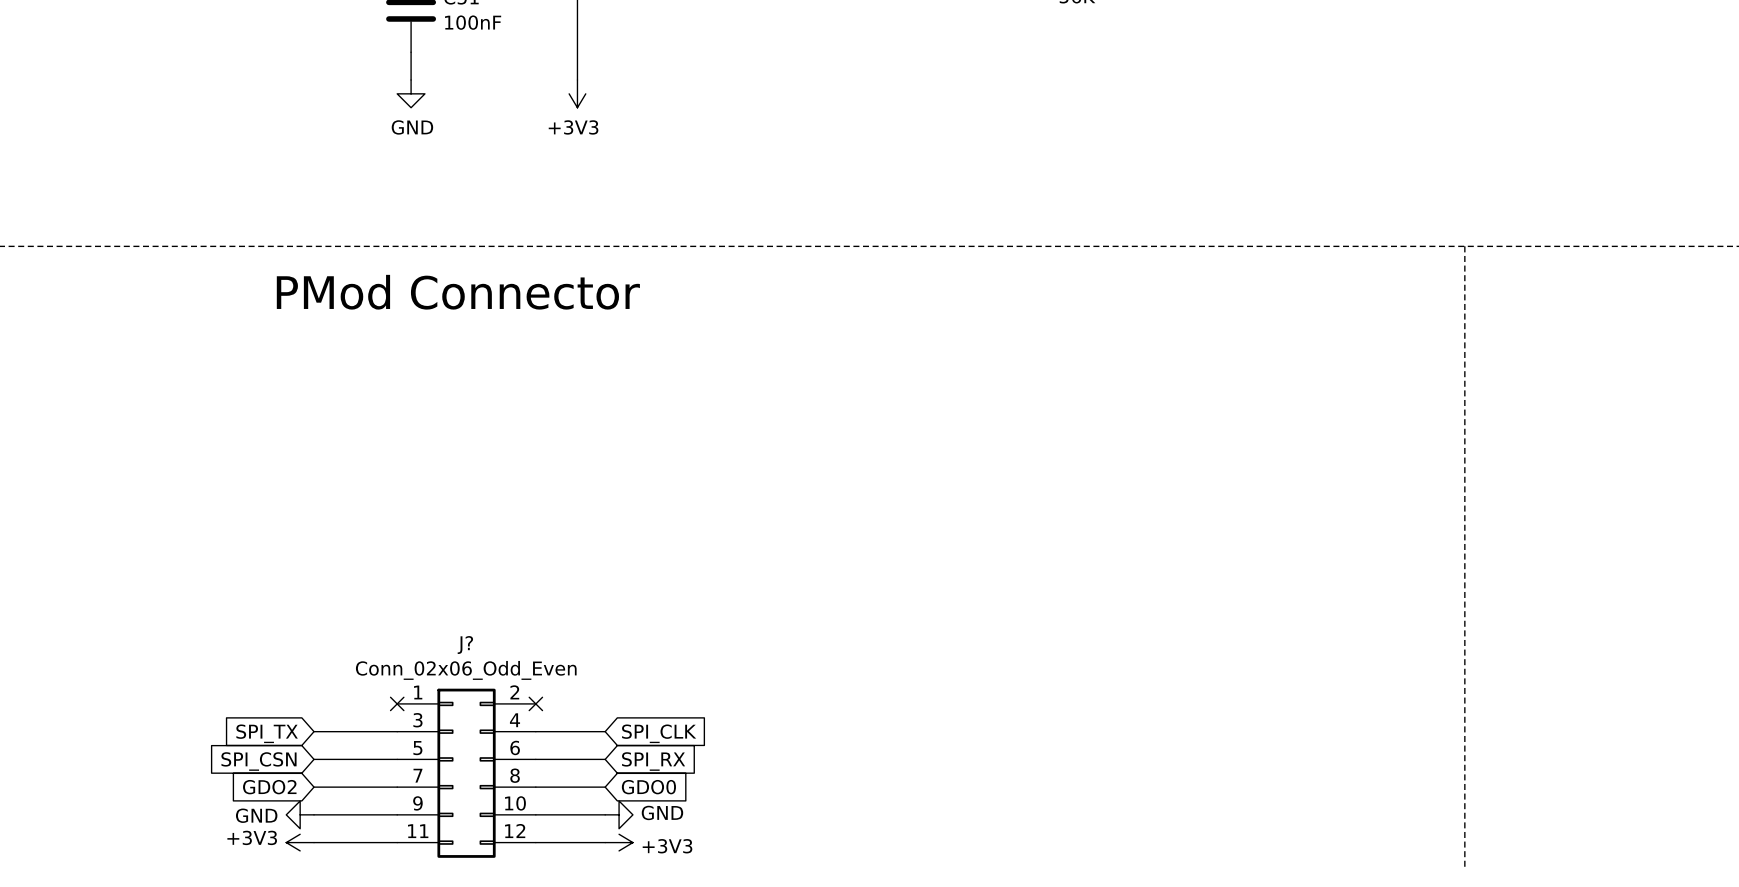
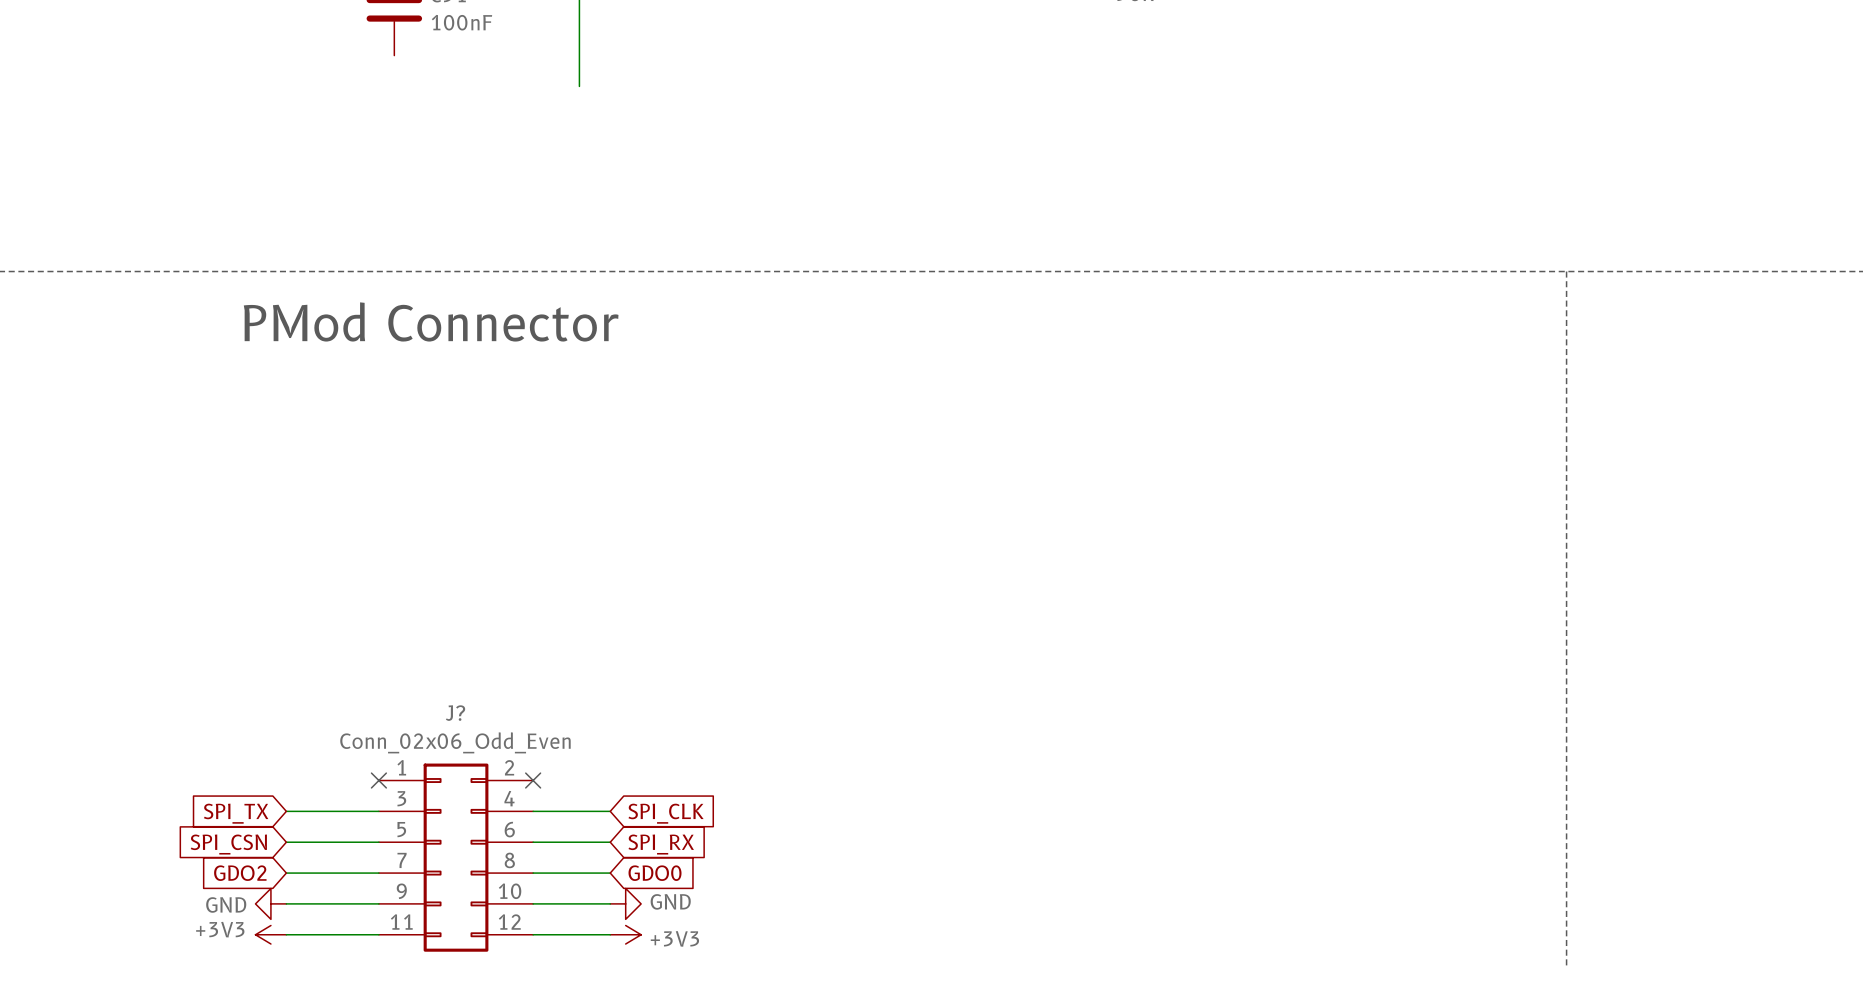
wire: (411, 52) (411, 79) -> none
power symbol: GND (411, 93) -> none
power symbol: +3V3 (577, 93) -> none

